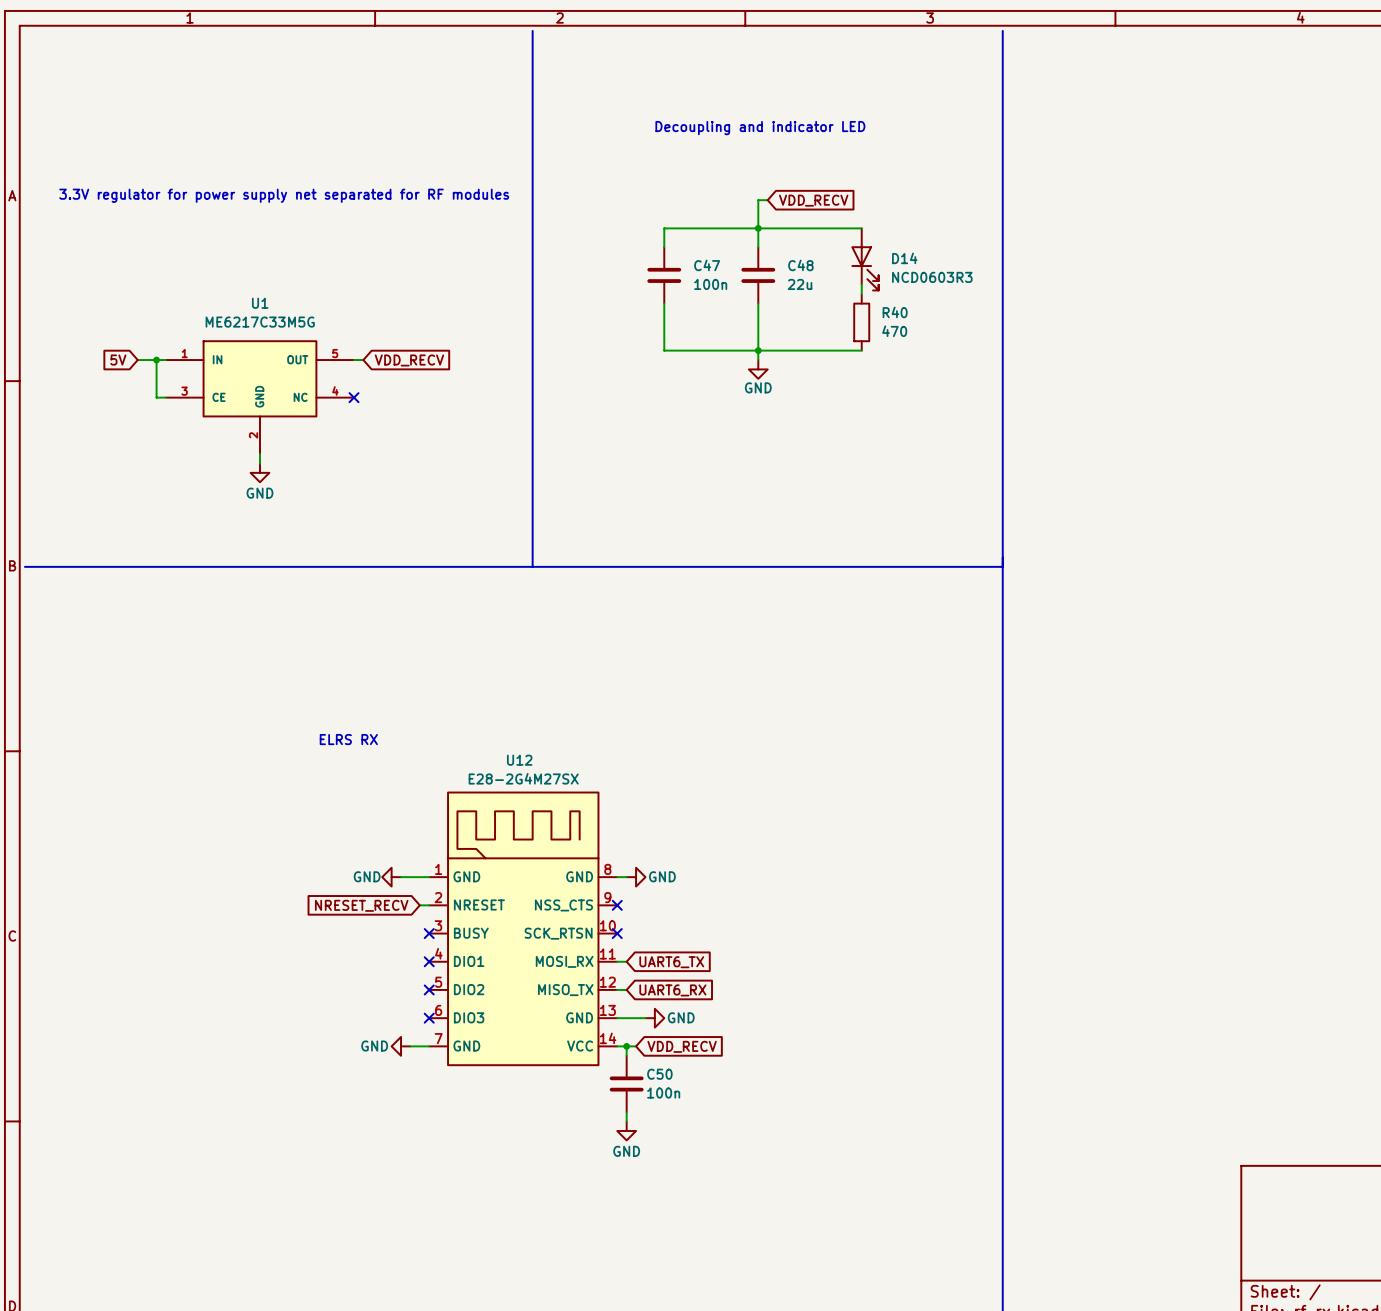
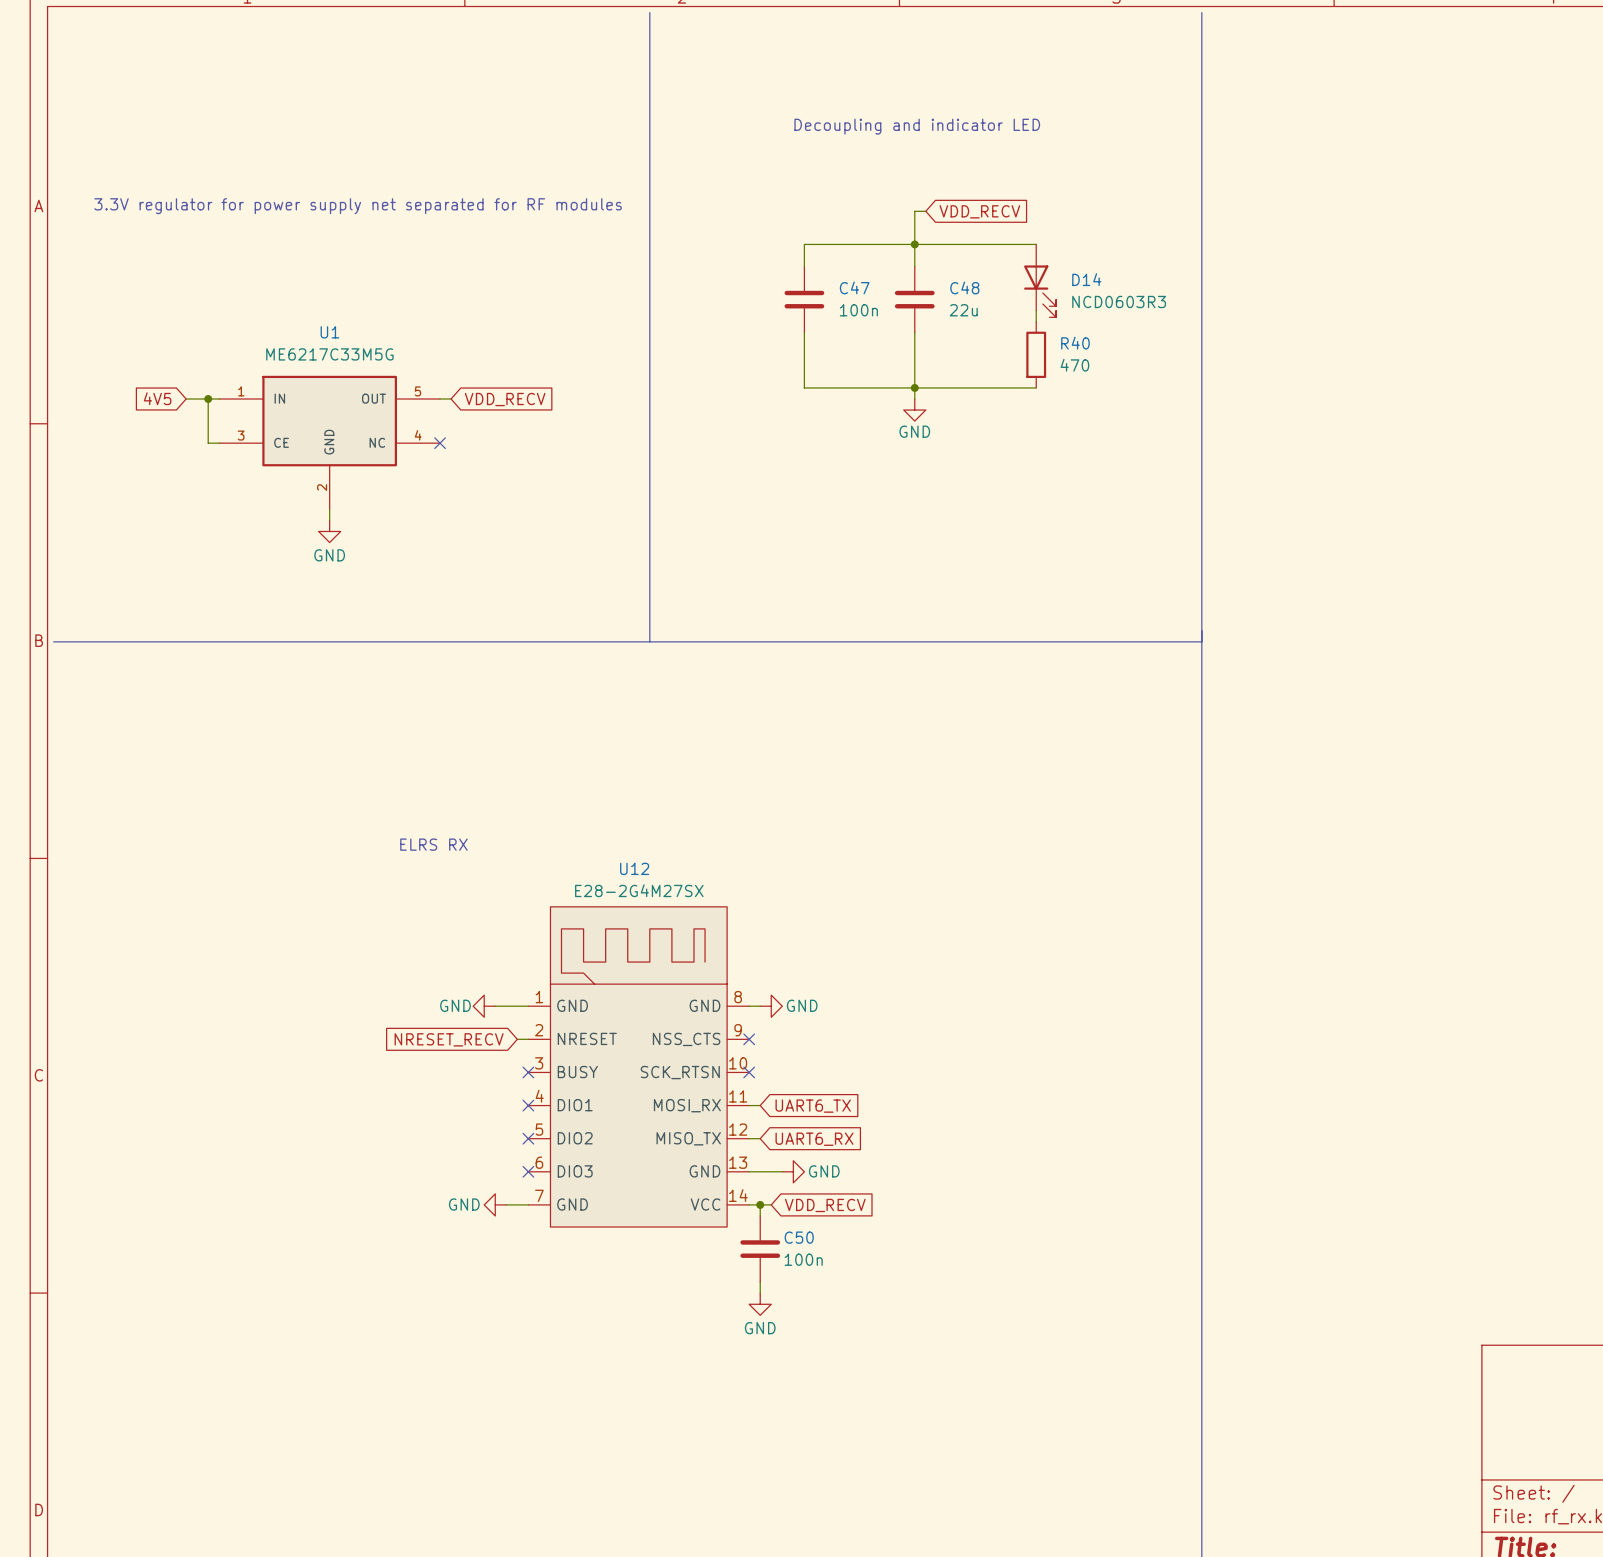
global label: 5V (118, 360) -> 4V5 (157, 398)

